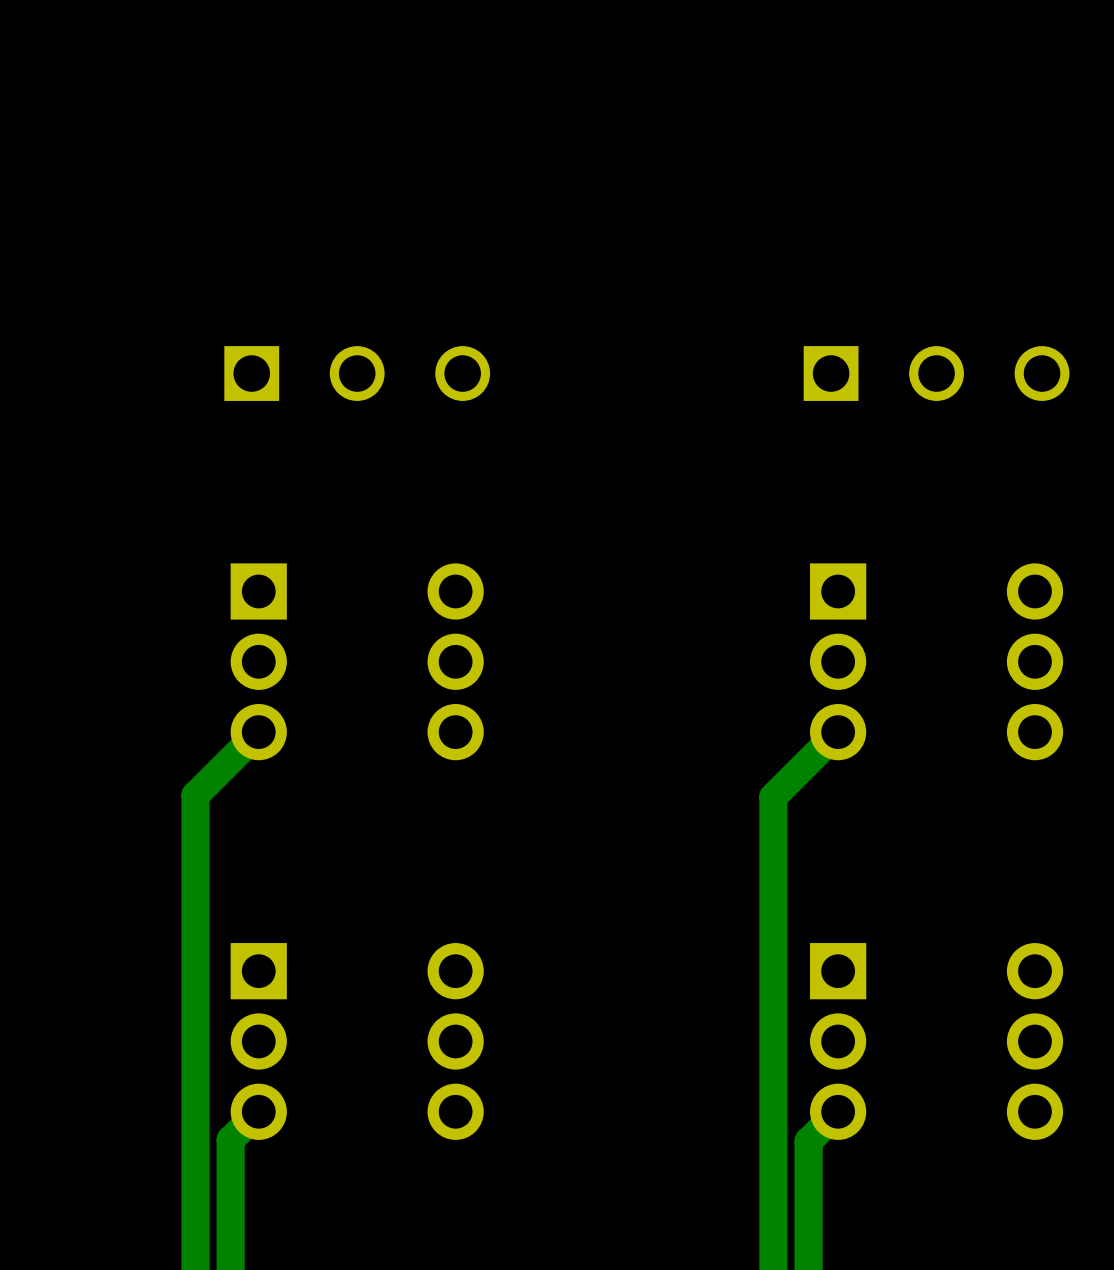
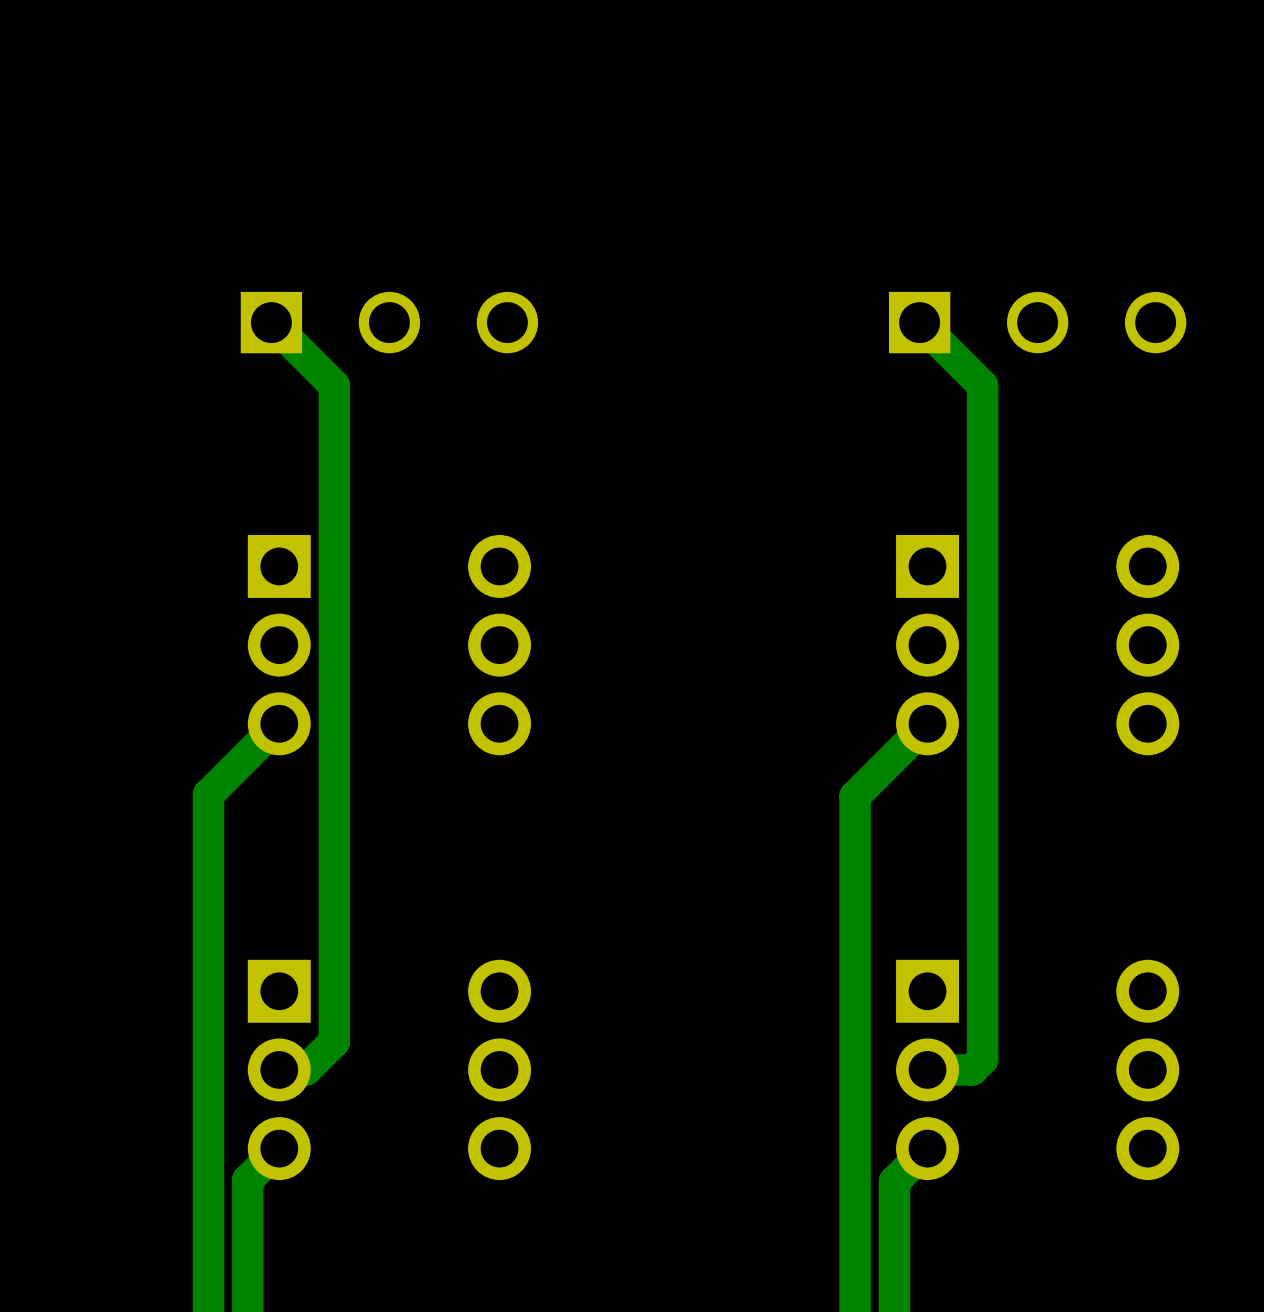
track: none -> (271, 322) (334, 385) (334, 1041) (306, 1069) (279, 1069)
track: none -> (919, 322) (982, 385) (982, 1059) (972, 1069) (927, 1069)

